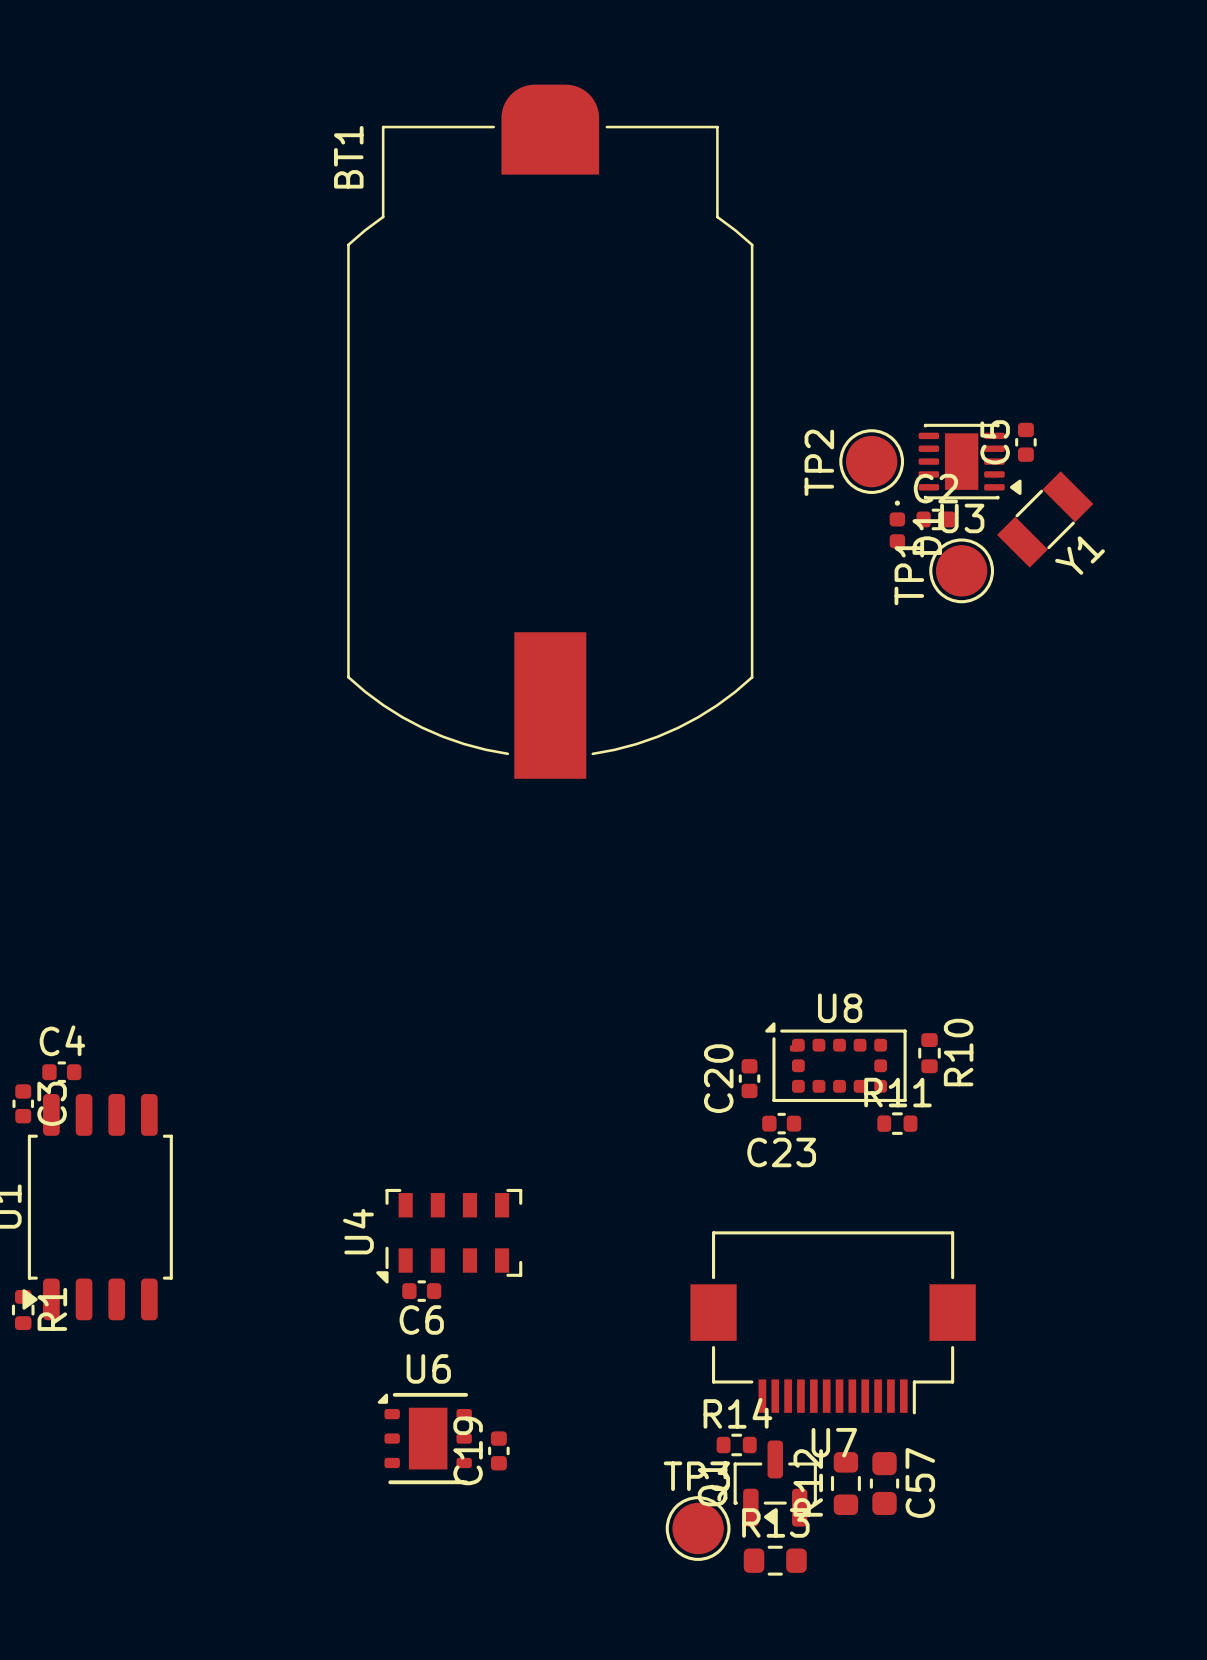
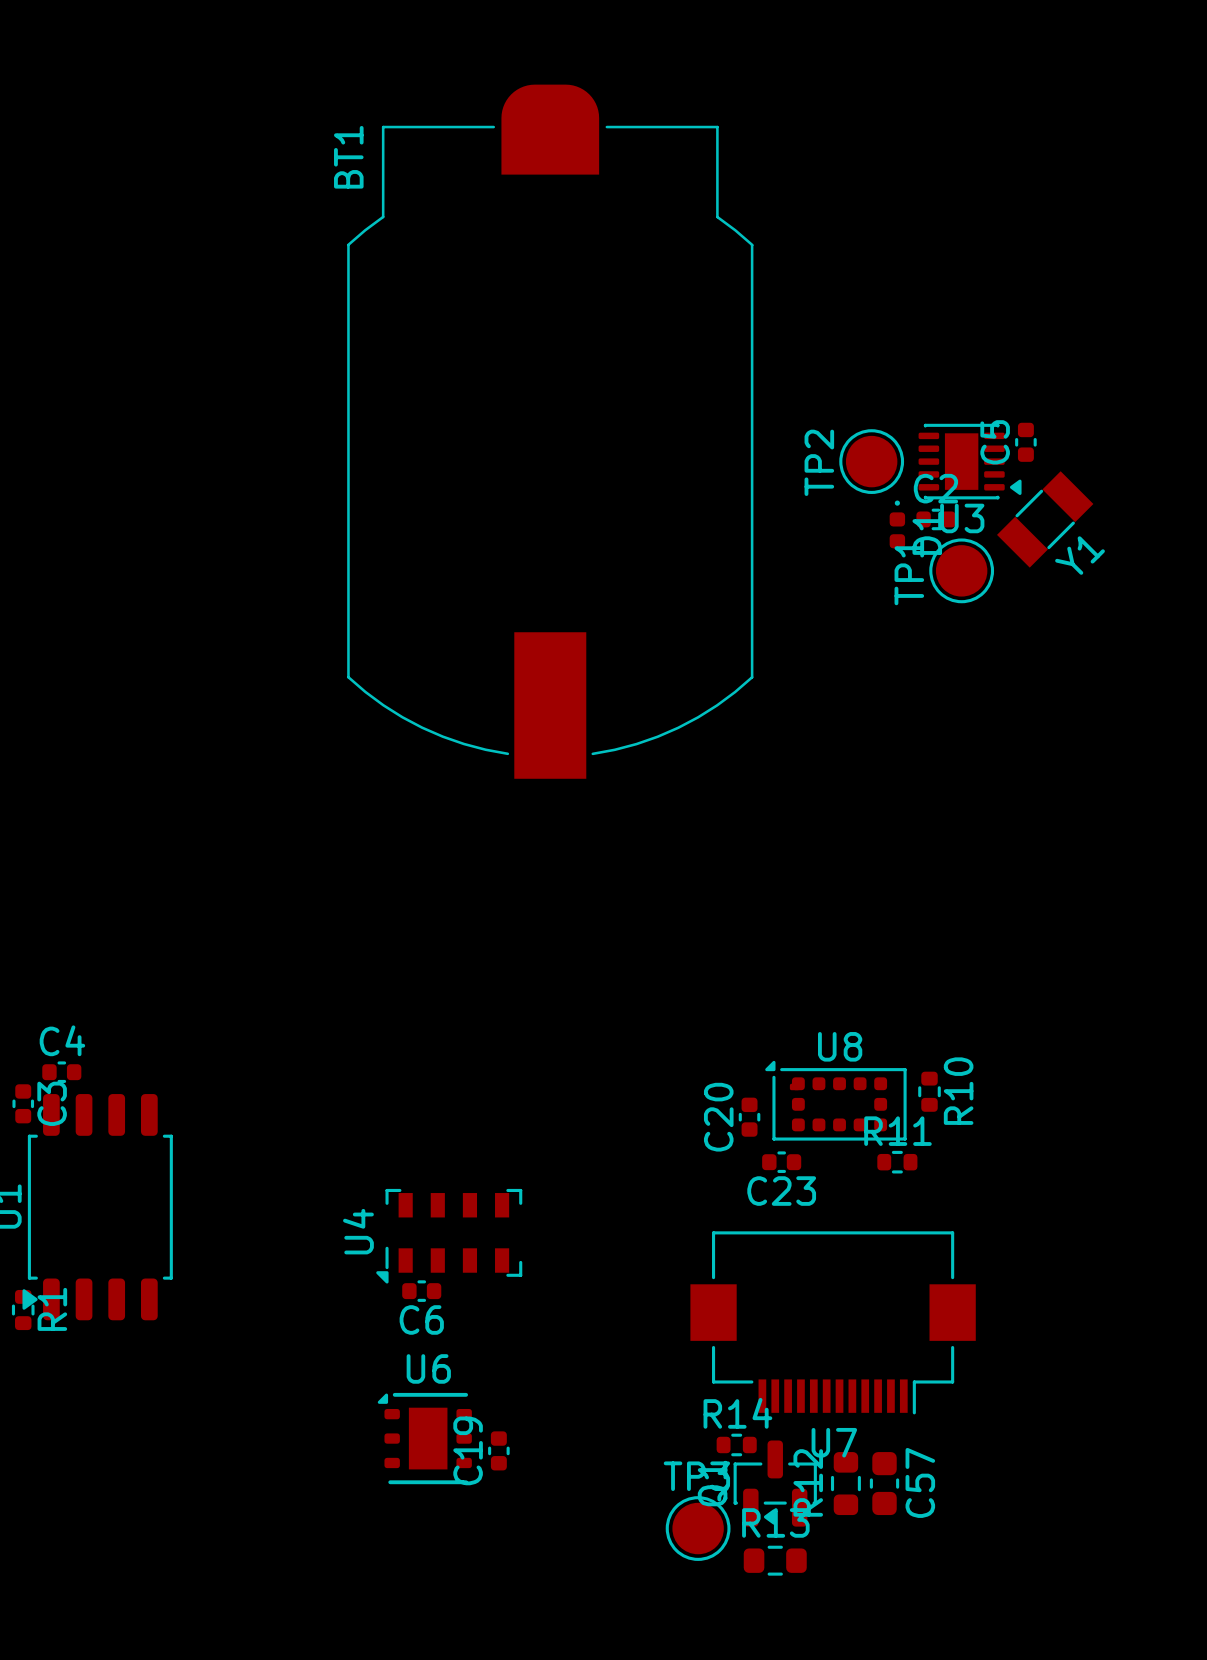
R10 position: (929, 1053) -> (929, 1091)
U8 position: (835, 1062) -> (835, 1100)
C20 position: (749, 1078) -> (749, 1117)
C23 position: (781, 1123) -> (781, 1162)
R11 position: (897, 1123) -> (897, 1162)

